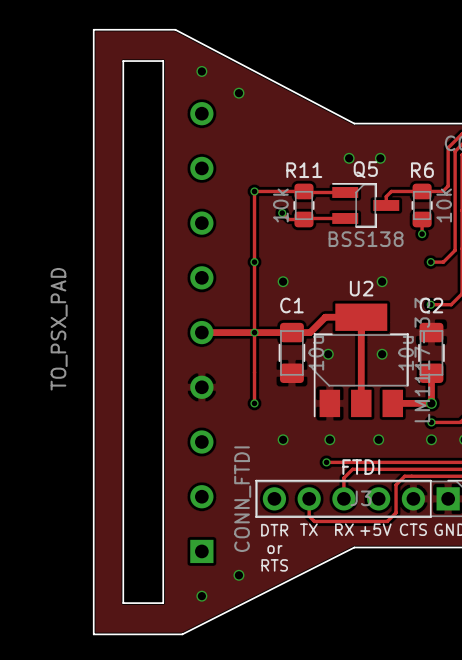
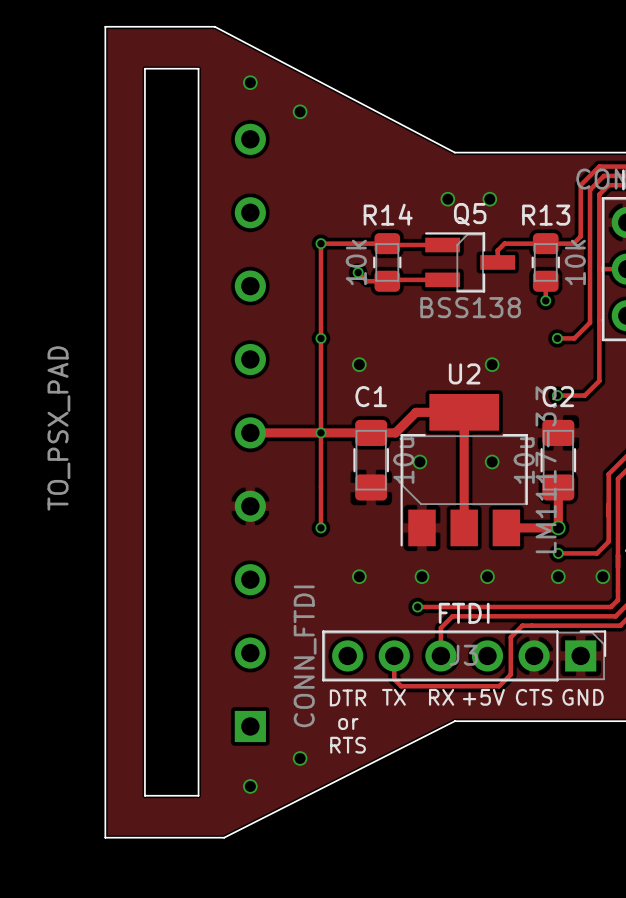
R11 name: R11 (304, 170) -> R14 (388, 214)
R6 name: R6 (422, 170) -> R13 (546, 215)

